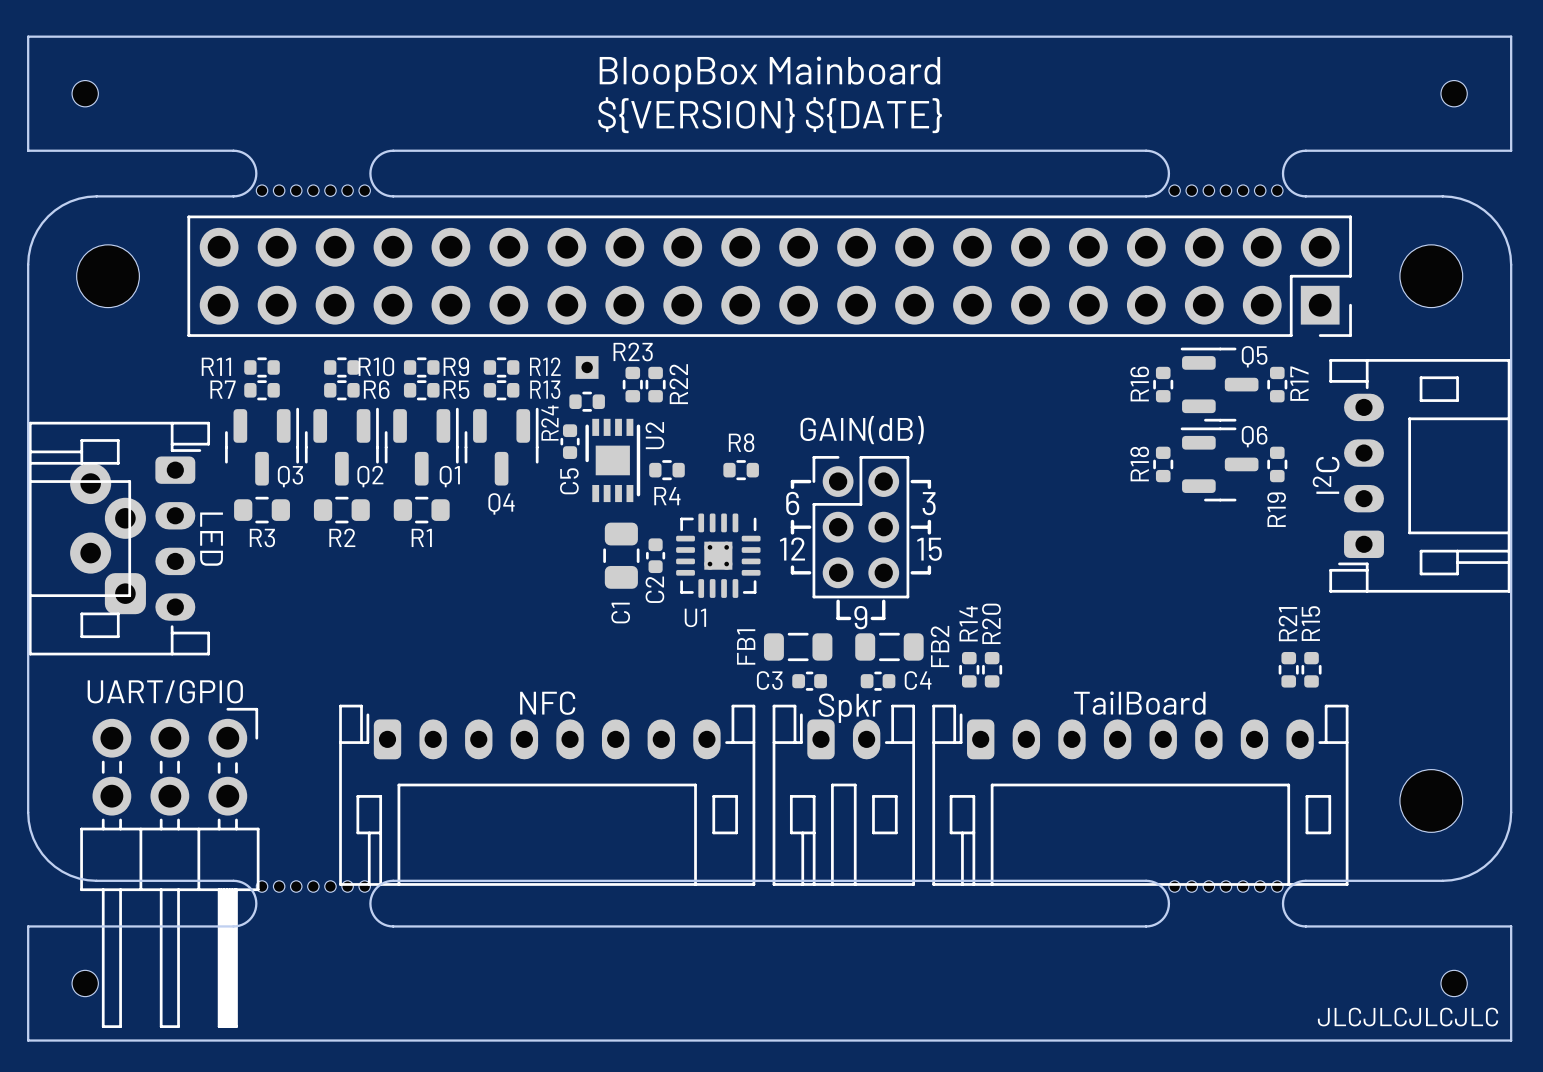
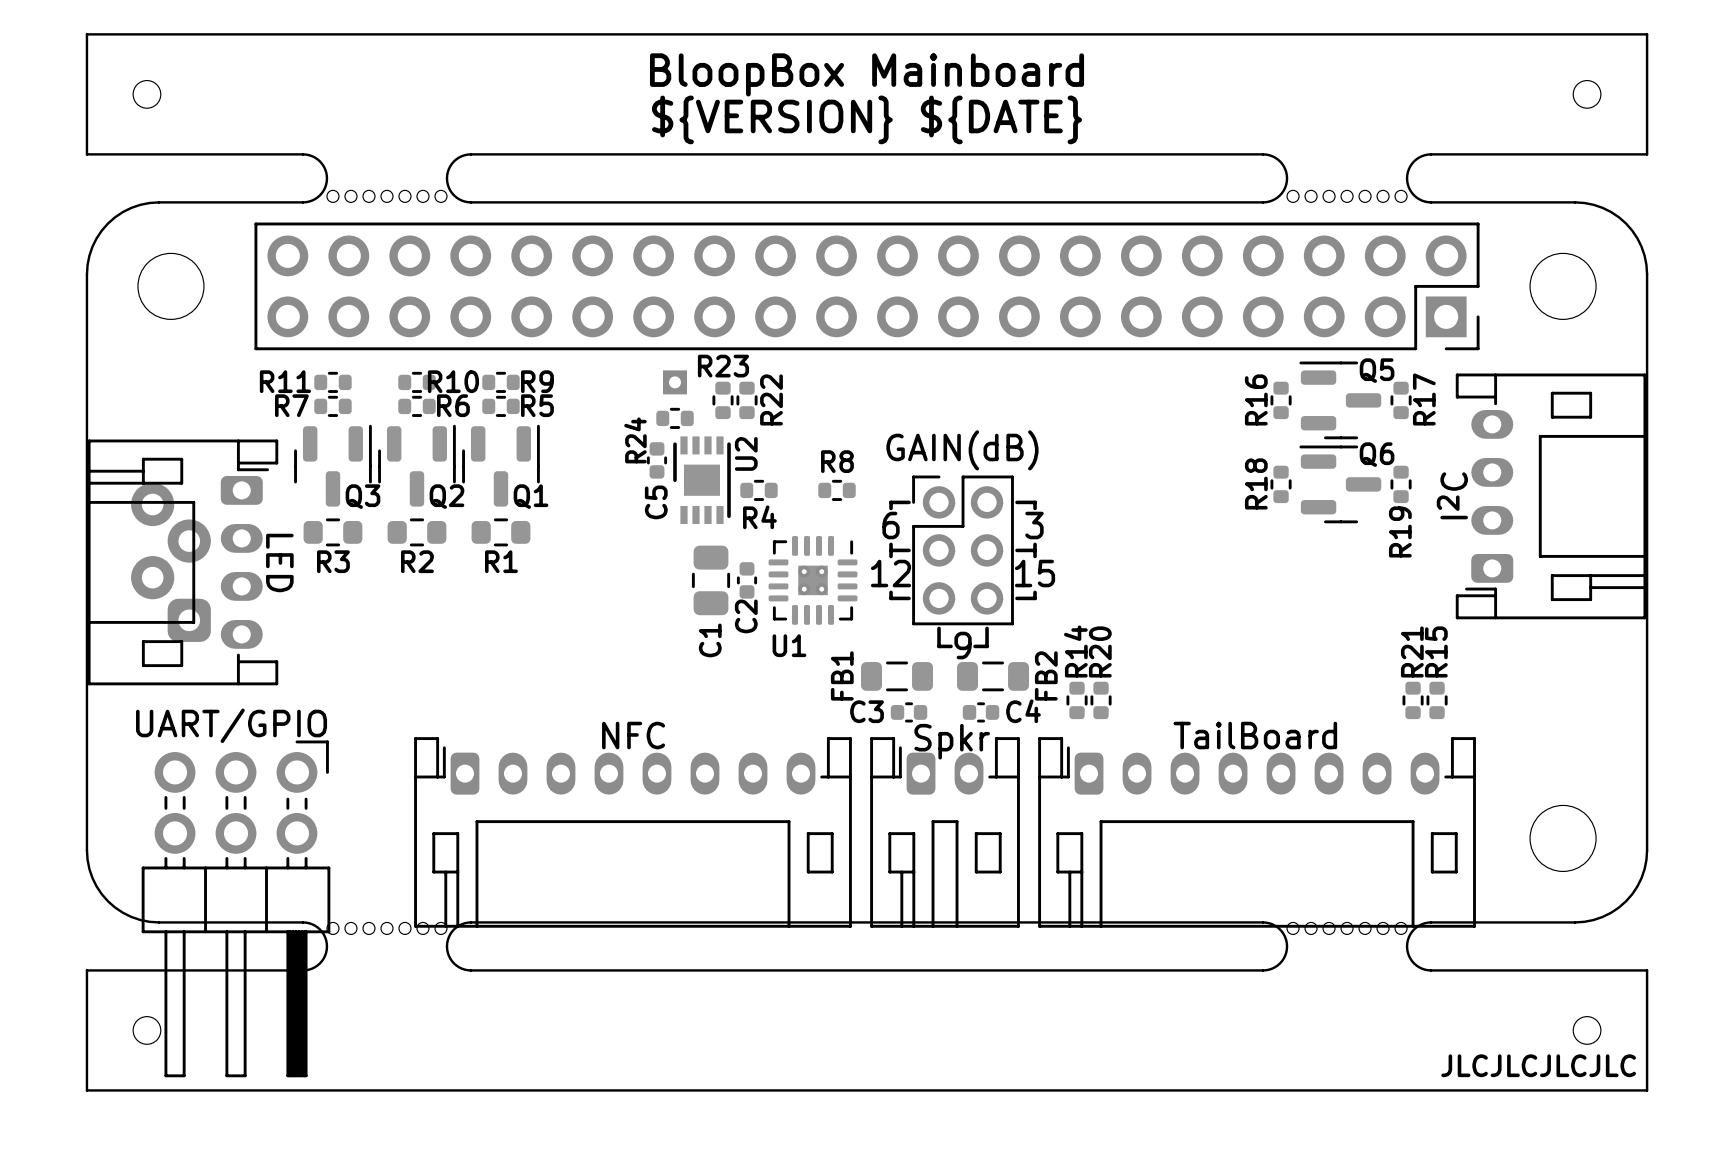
R12: (501, 367) -> none
R13: (501, 390) -> none
Q4: (501, 446) -> none

